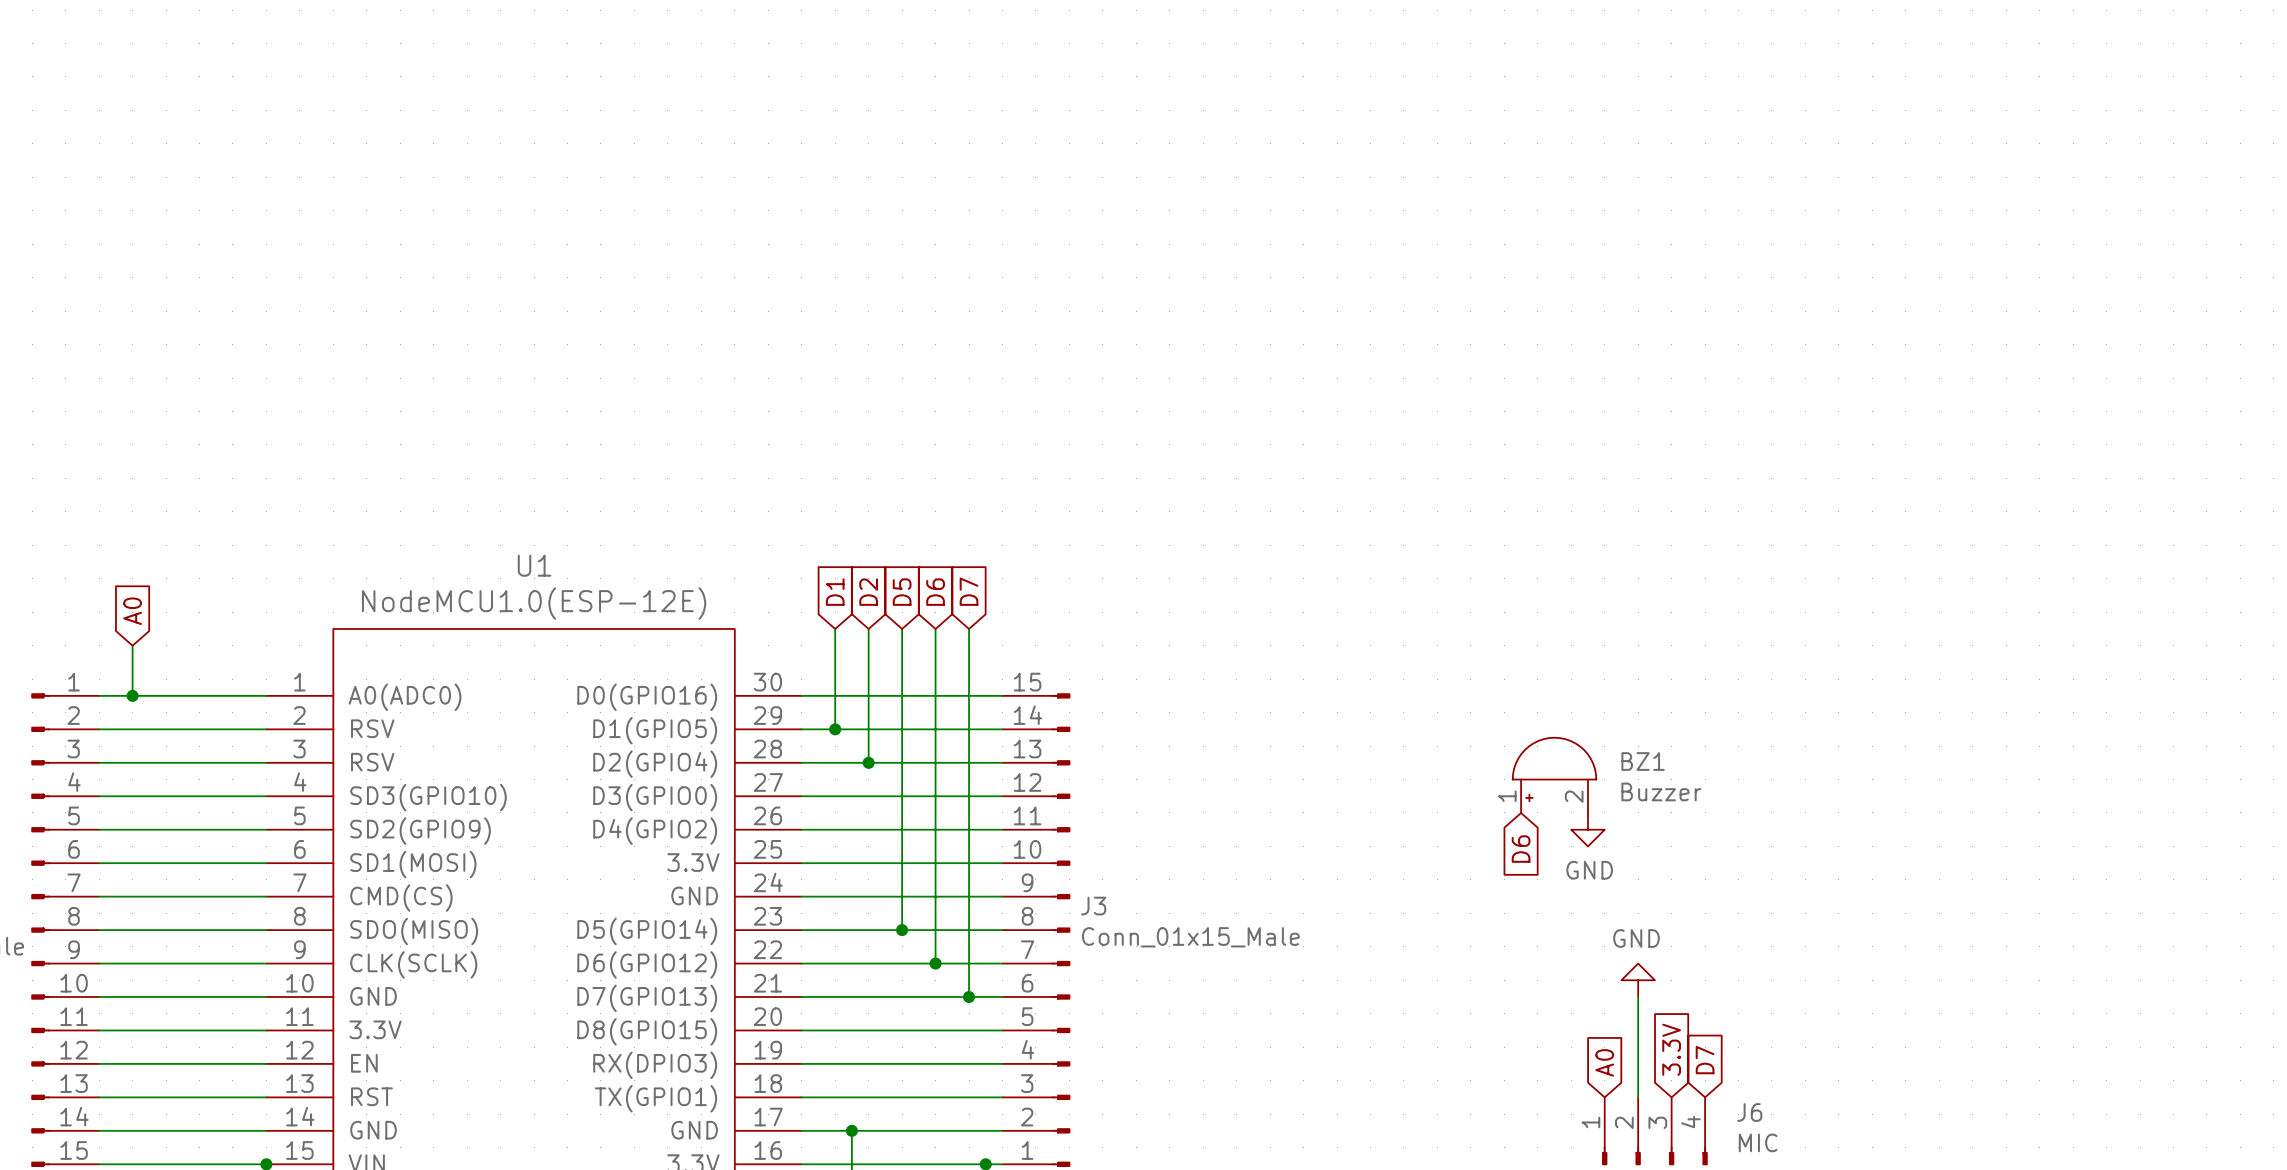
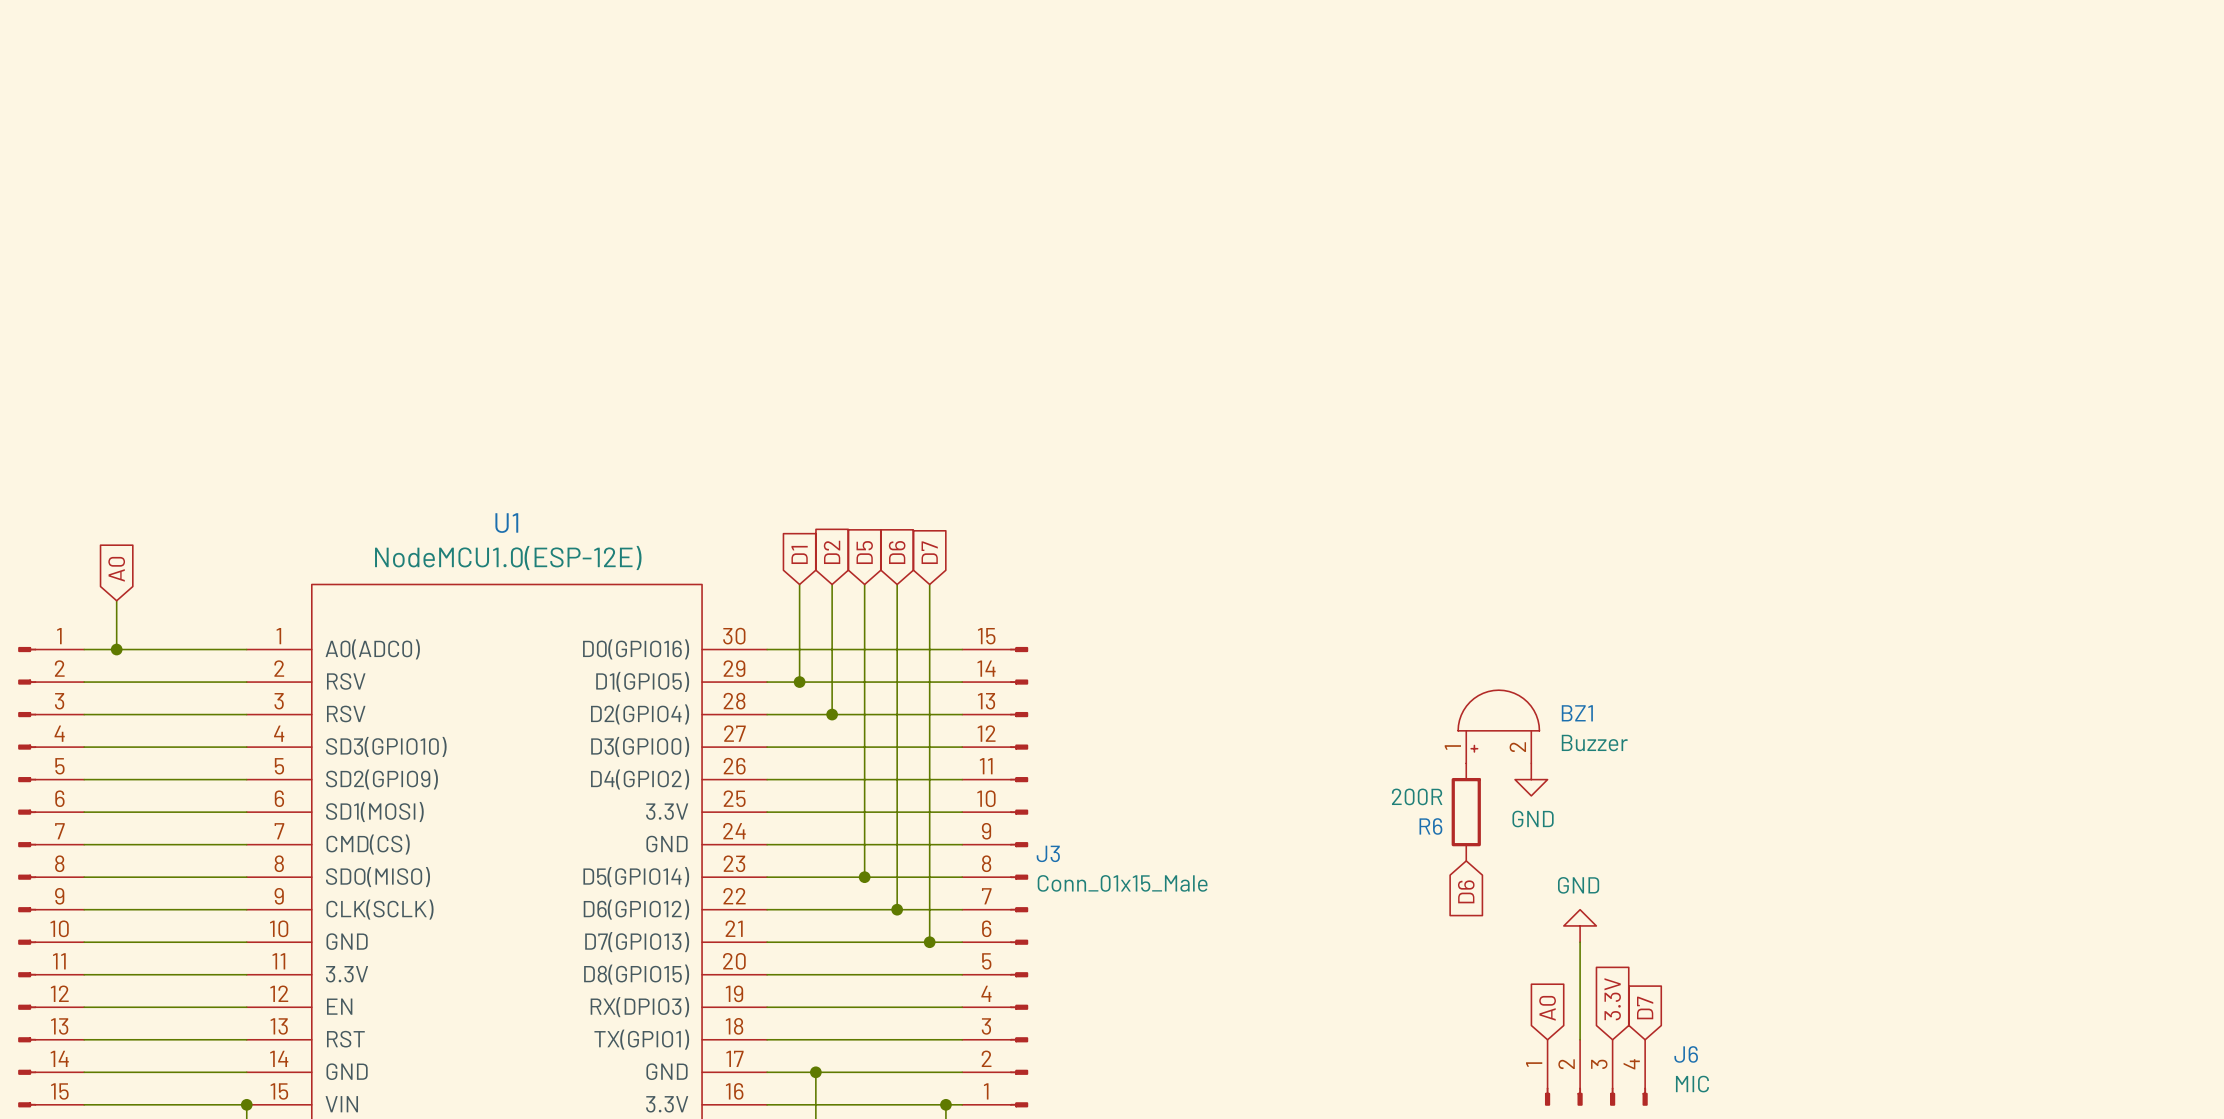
global label position: D6 (1521, 849) -> D6 (1466, 891)
R6: none -> 200R (1466, 812)

